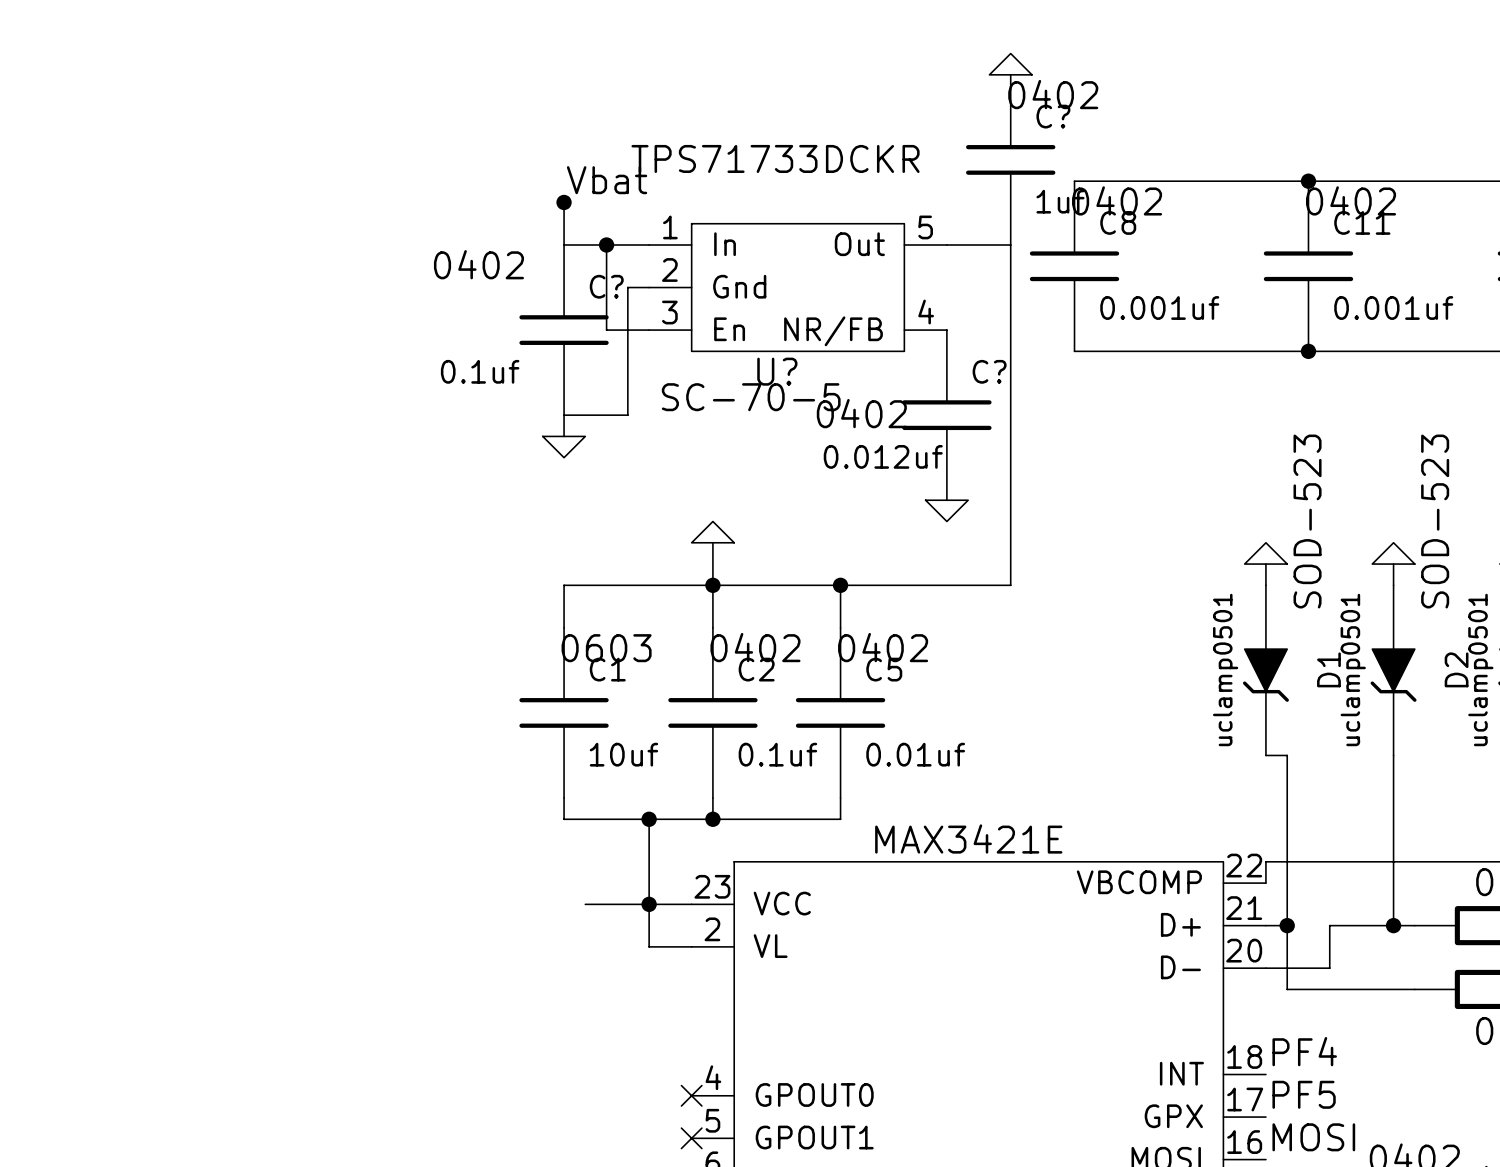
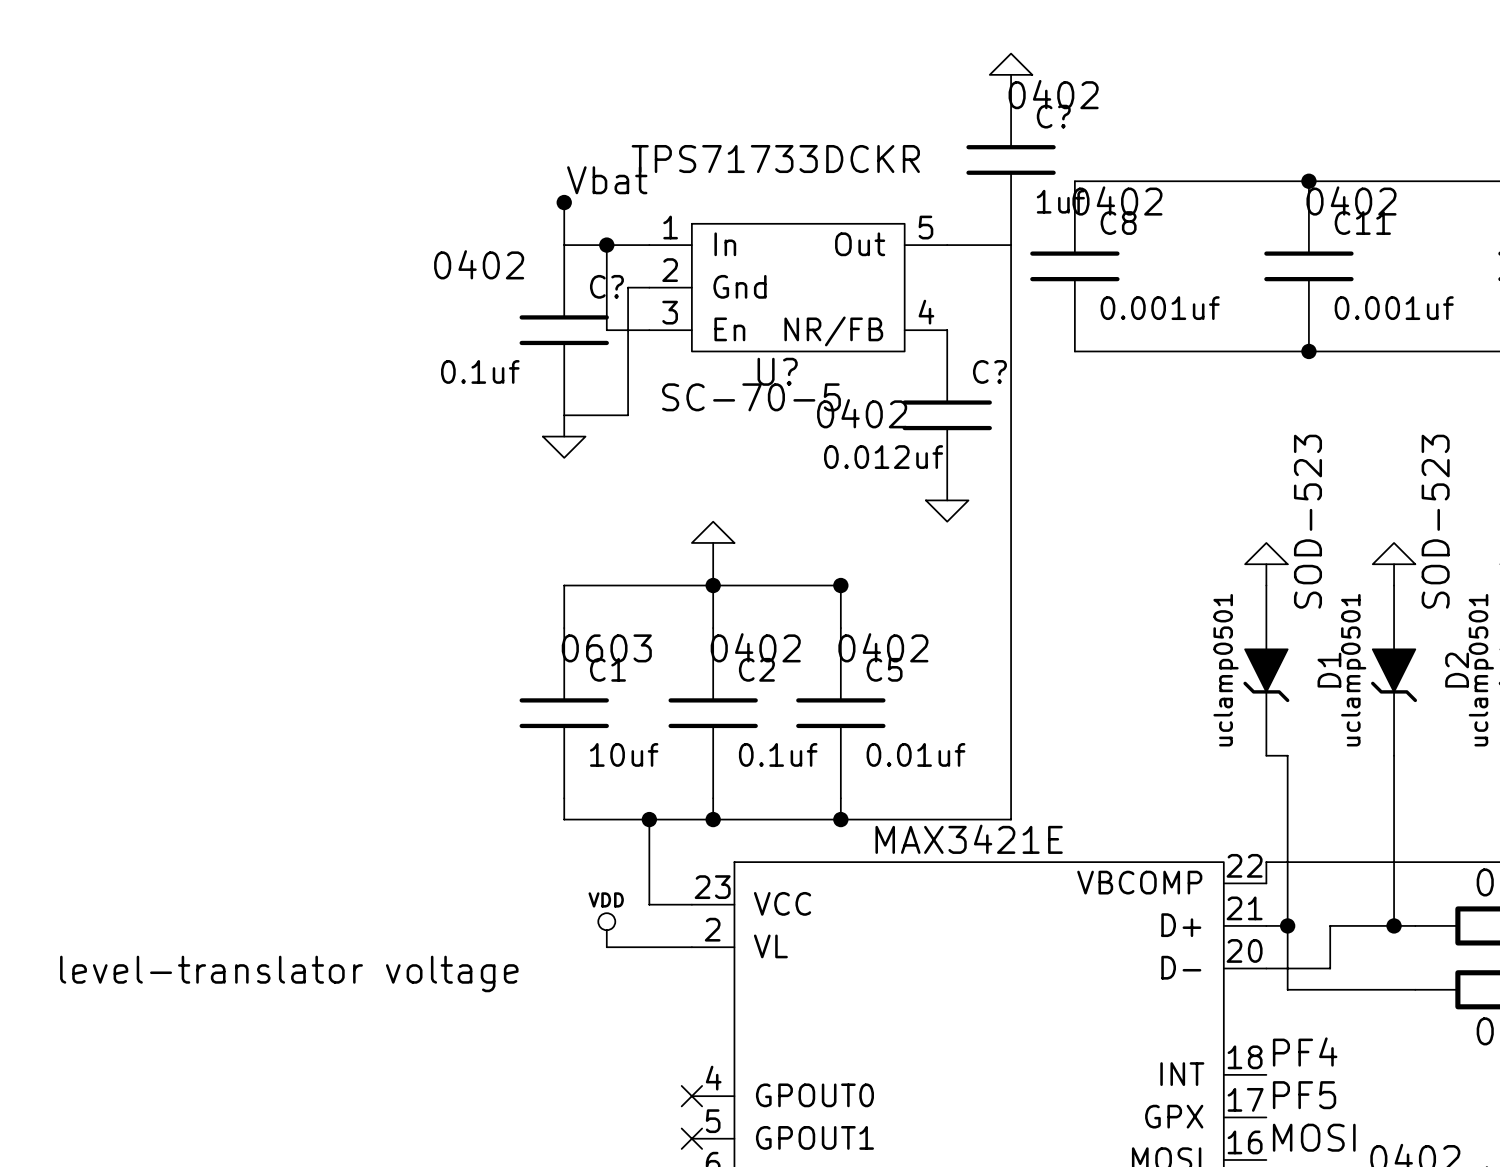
wire: (840, 585) (1010, 585) -> (840, 819) (1011, 819) (1011, 585)
junction: none -> (840, 819)
wire: (585, 904) (649, 904) (649, 946) -> (606, 947) (649, 947)
junction: (649, 904) -> none
power symbol: none -> VDD (606, 930)
text: none -> level-translator voltage (289, 973)

